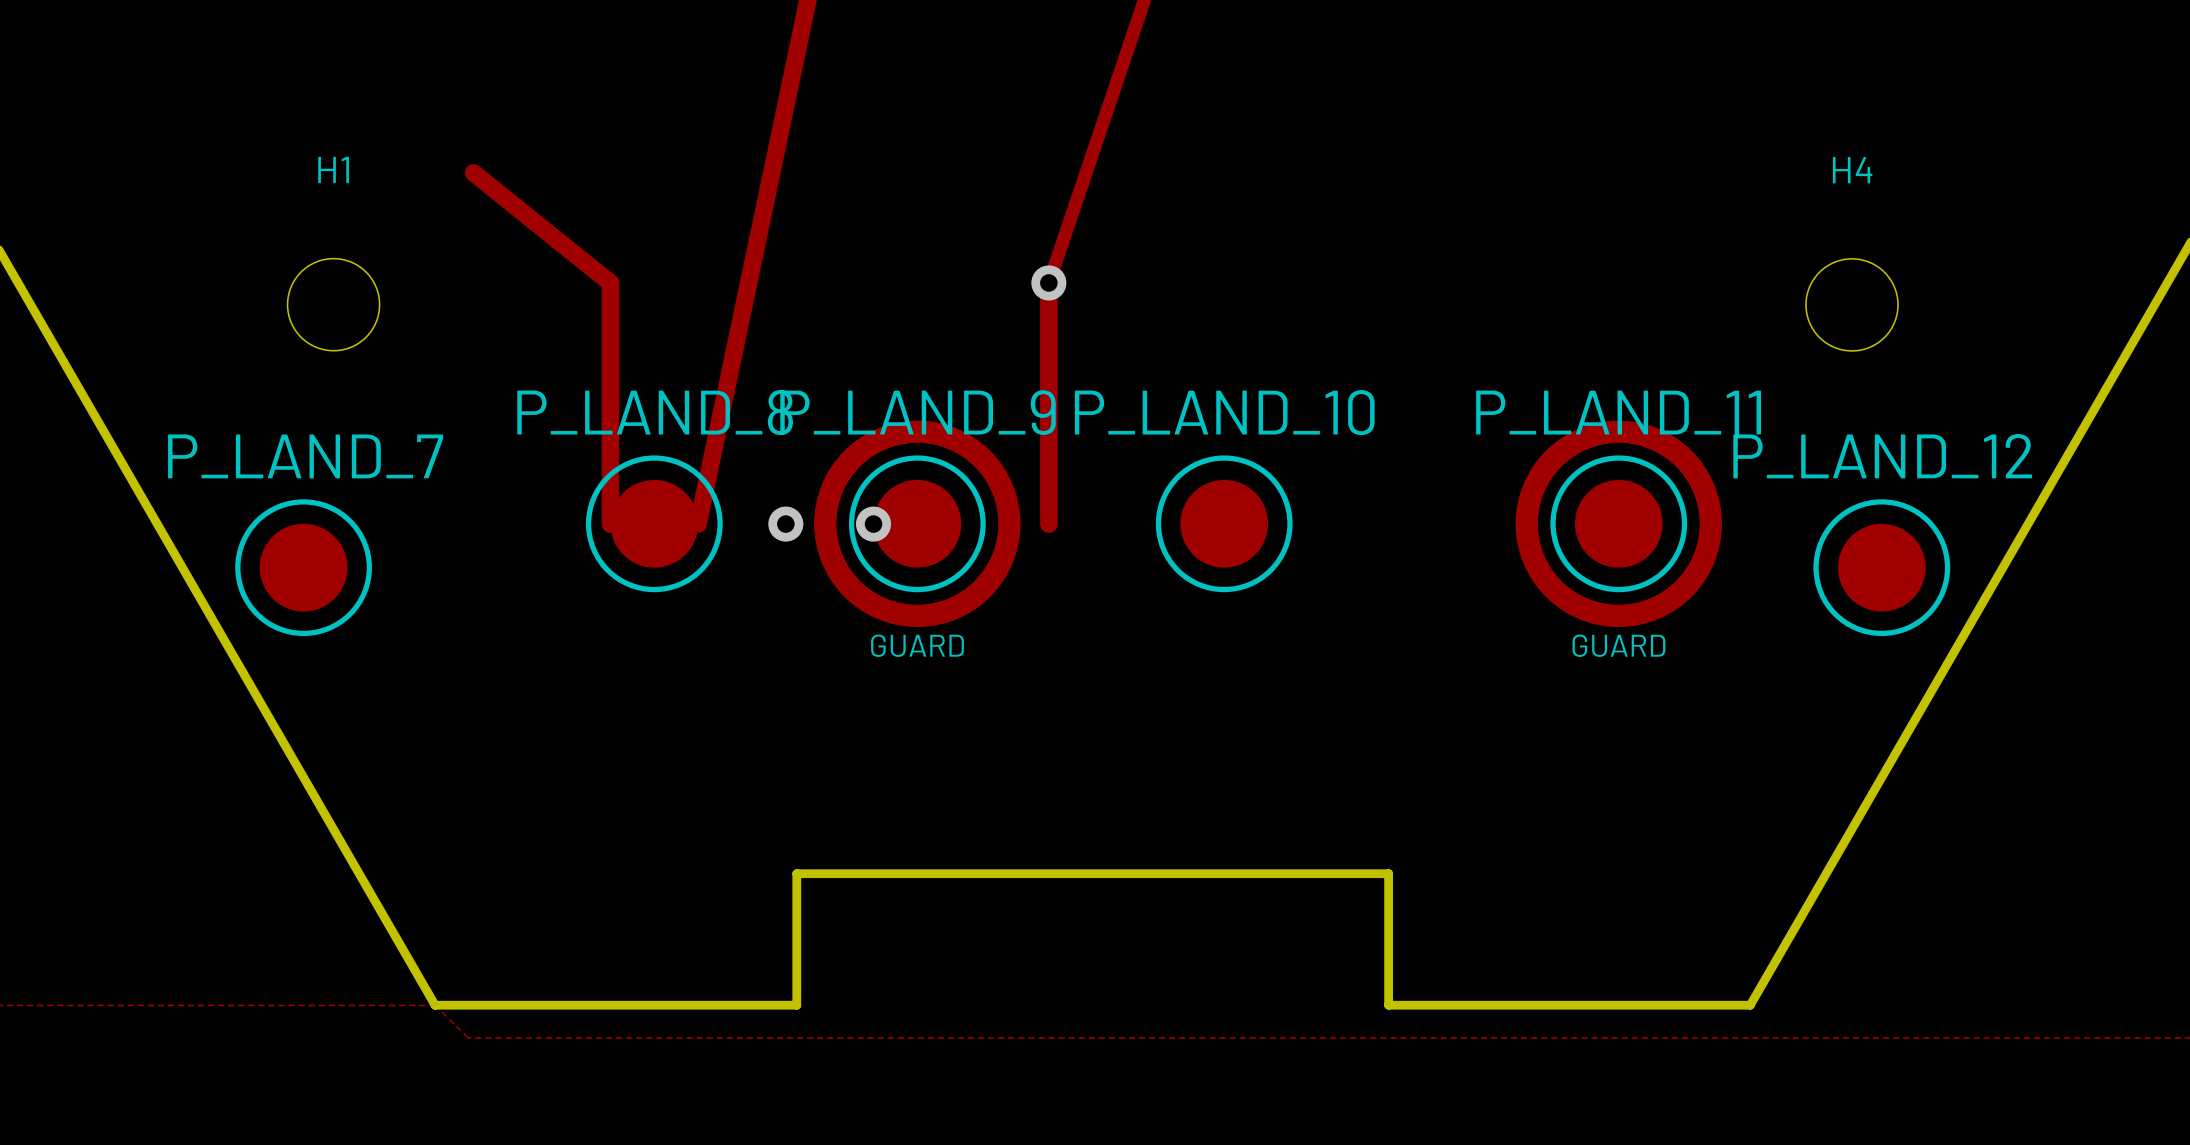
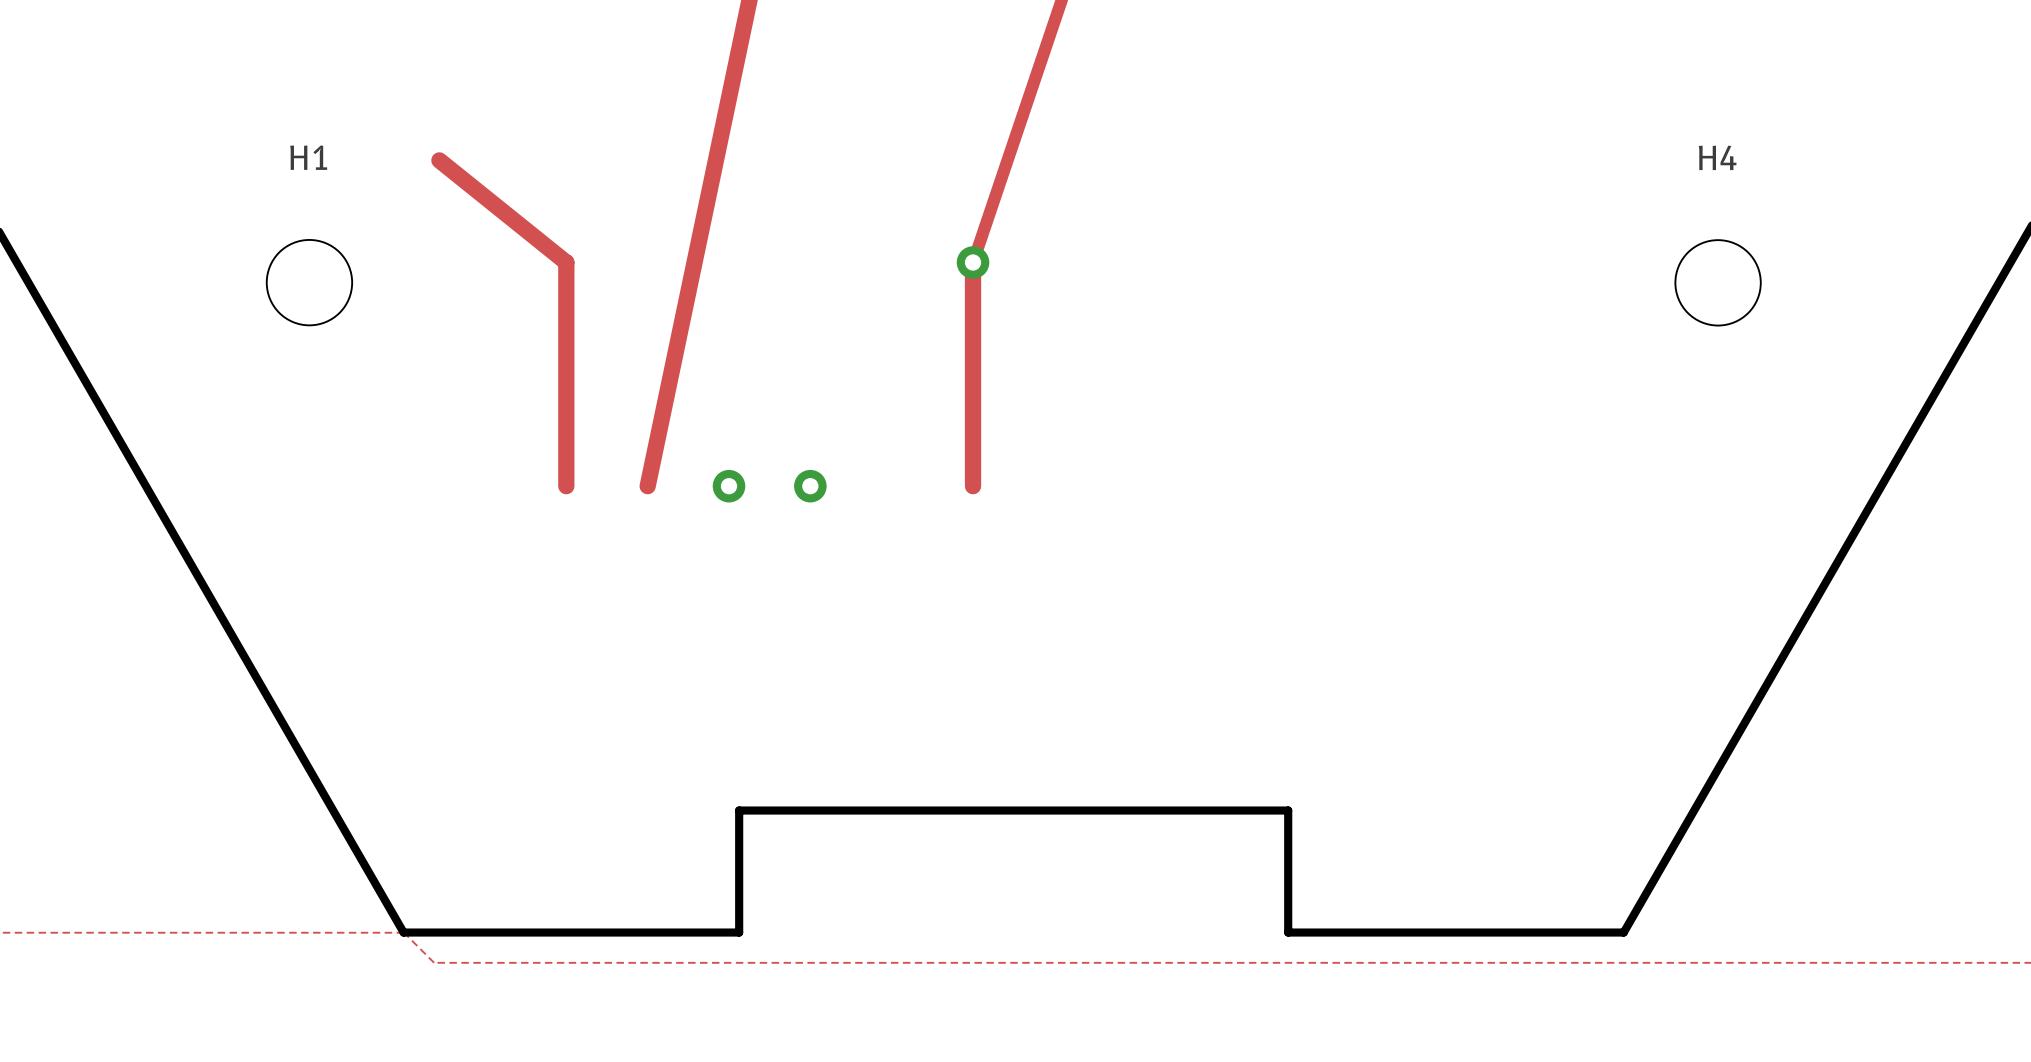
P_LAND_8: (654, 523) -> none
P_LAND_9: (917, 523) -> none
P_LAND_10: (1224, 523) -> none
P_LAND_11: (1618, 523) -> none
P_LAND_7: (303, 567) -> none
P_LAND_12: (1881, 567) -> none

